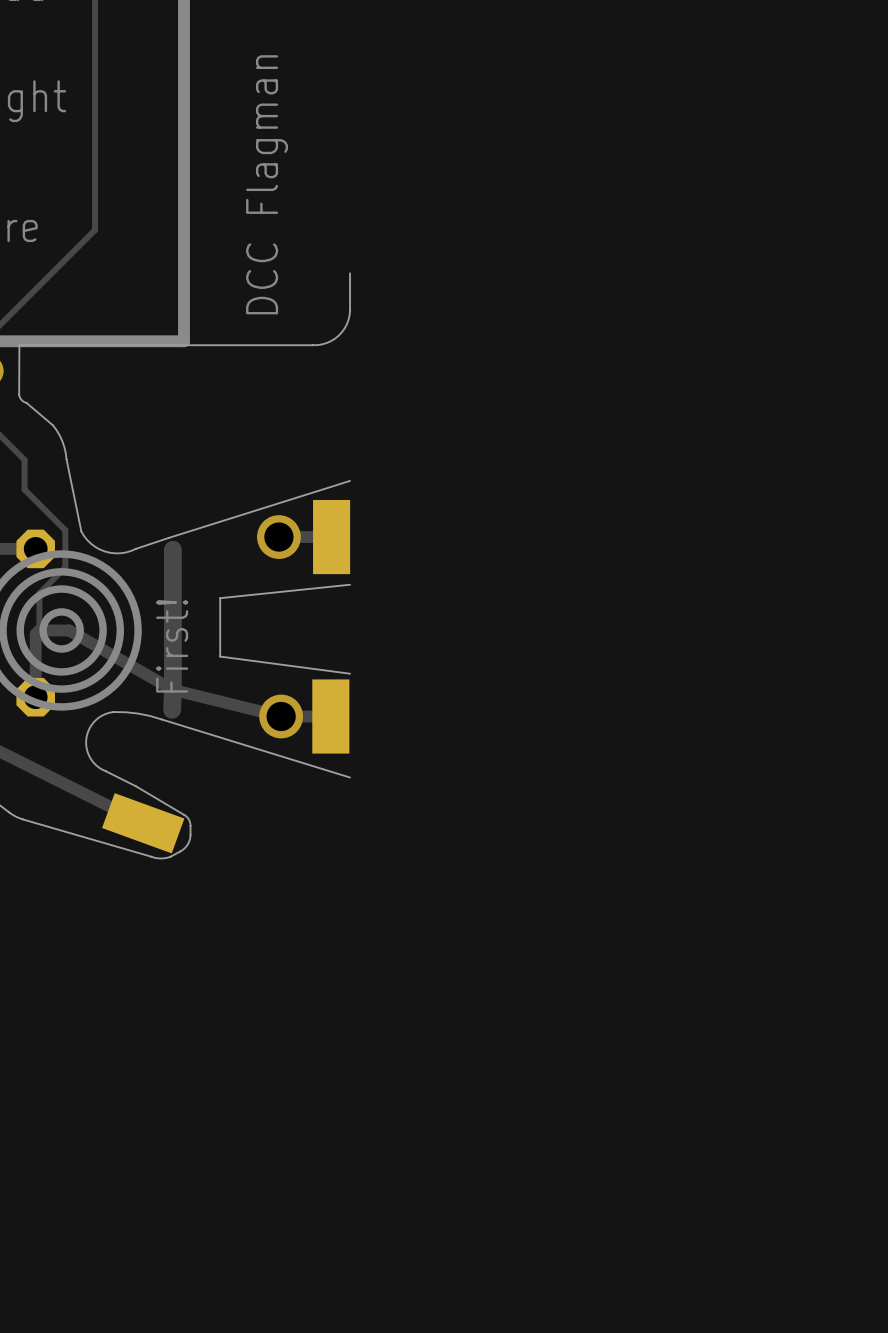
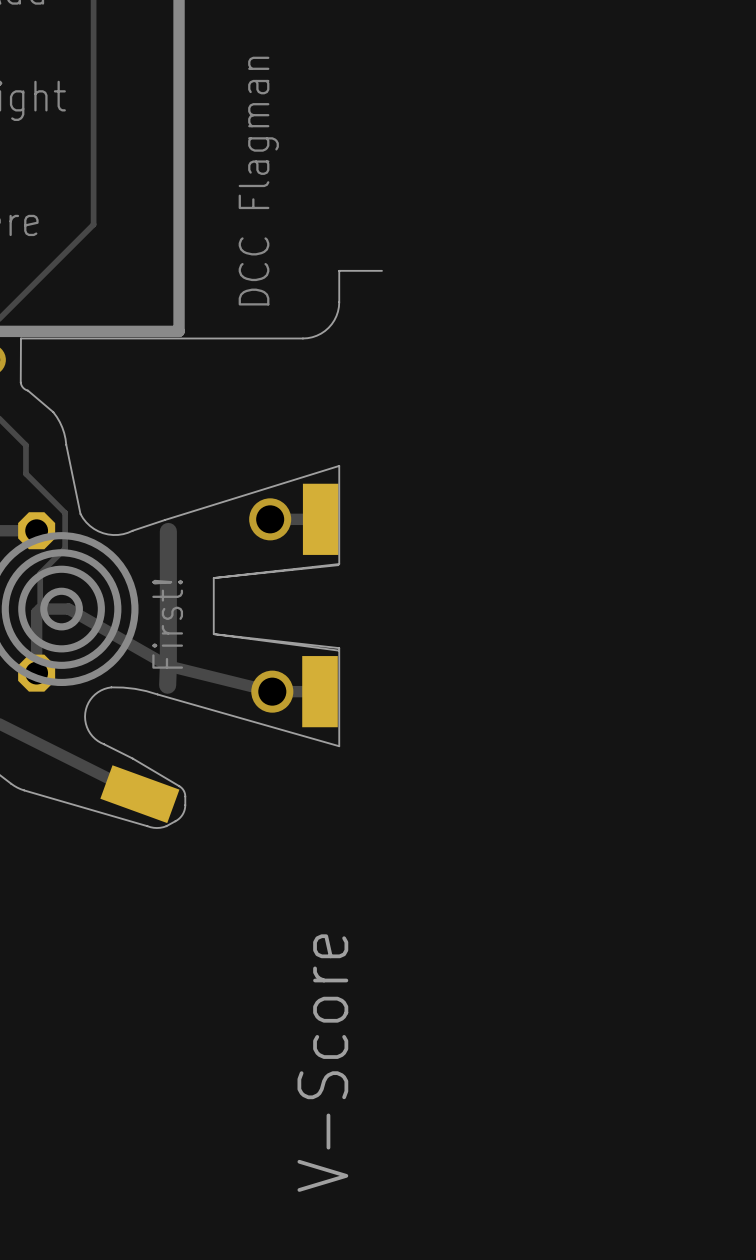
board edge: (350, 273) (348, 320) (338, 335) (326, 343) (313, 345) (19, 345) (19, 394) -> (381, 270) (339, 270) (339, 302) (336, 316) (328, 327) (312, 337) (20, 338) (20, 382)
board edge: (350, 480) (169, 537) -> (213, 578) (339, 564) (339, 465) (164, 520)
board edge: (161, 719) (350, 777) -> (157, 694) (339, 746) (339, 648) (213, 634)
text: none -> V-Score (322, 1063)

